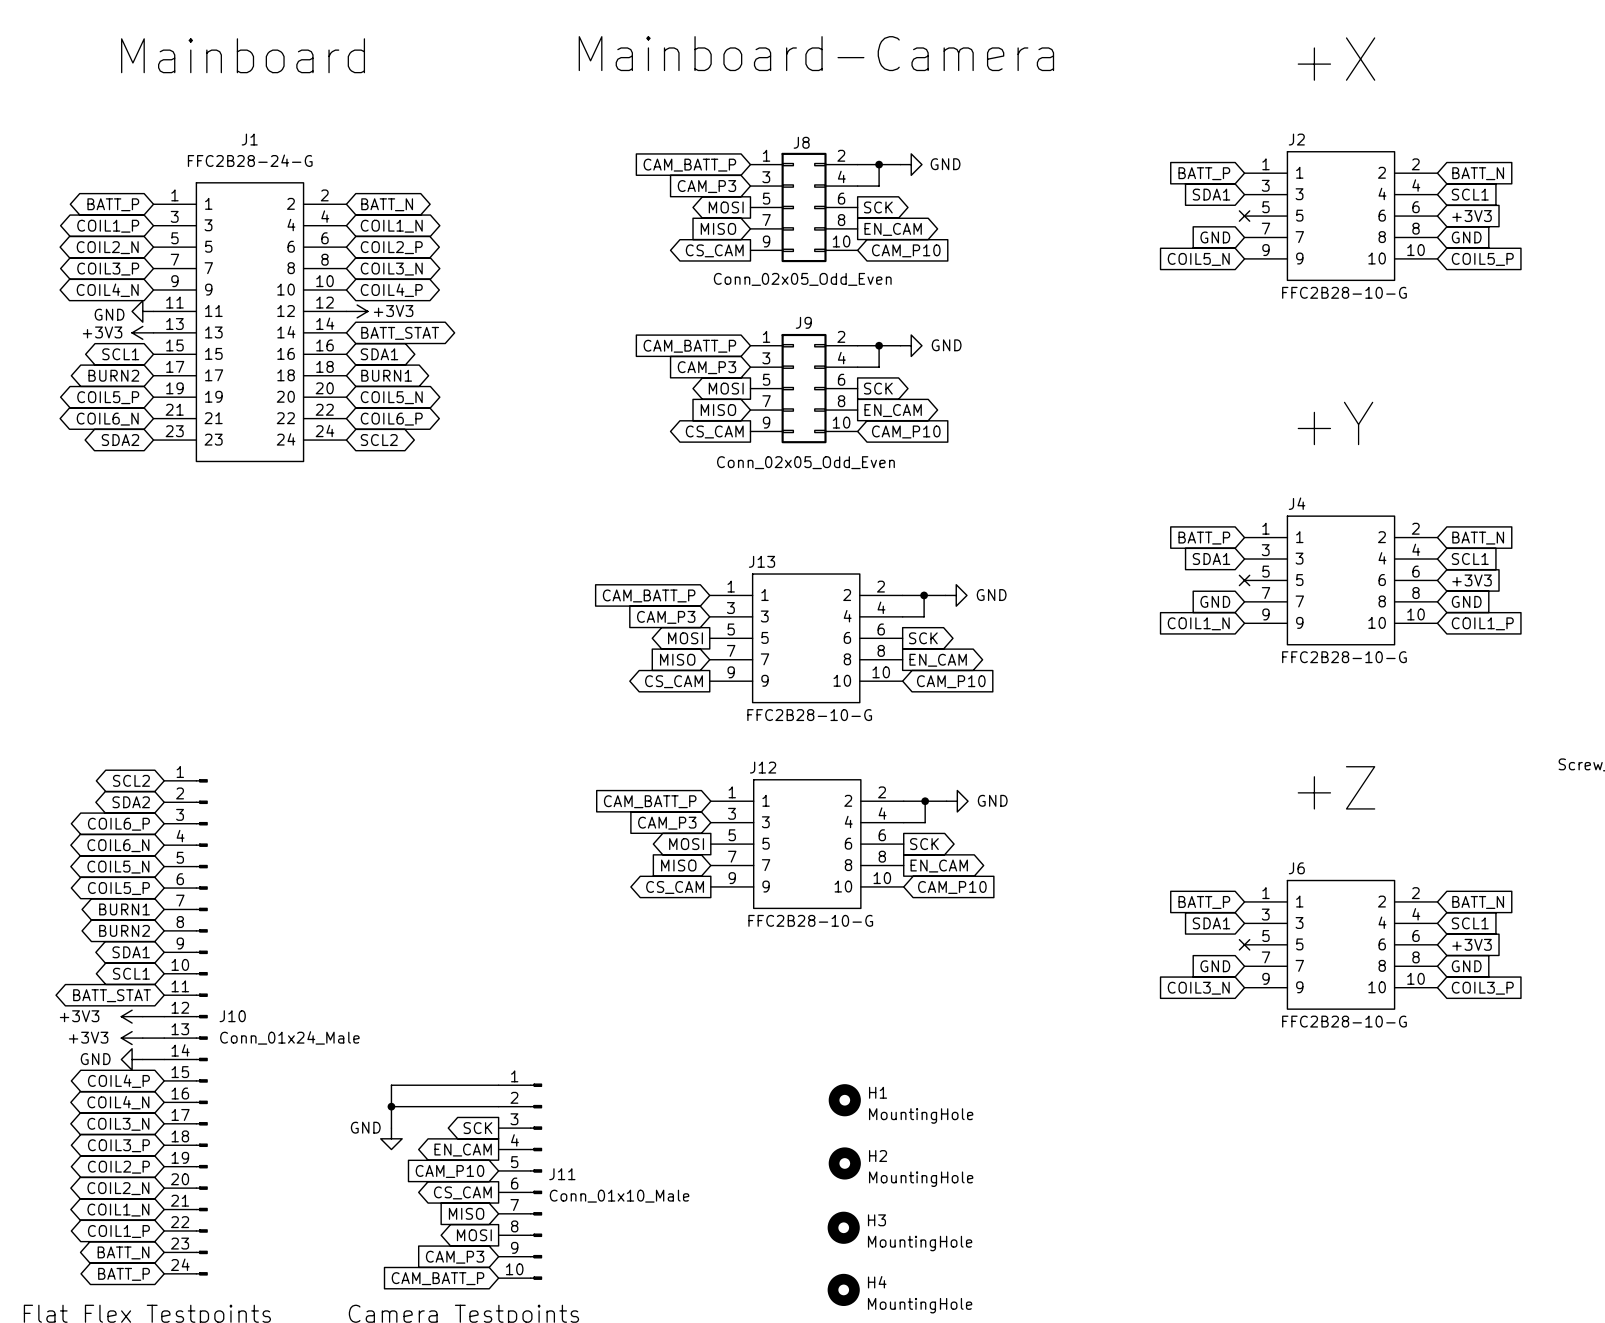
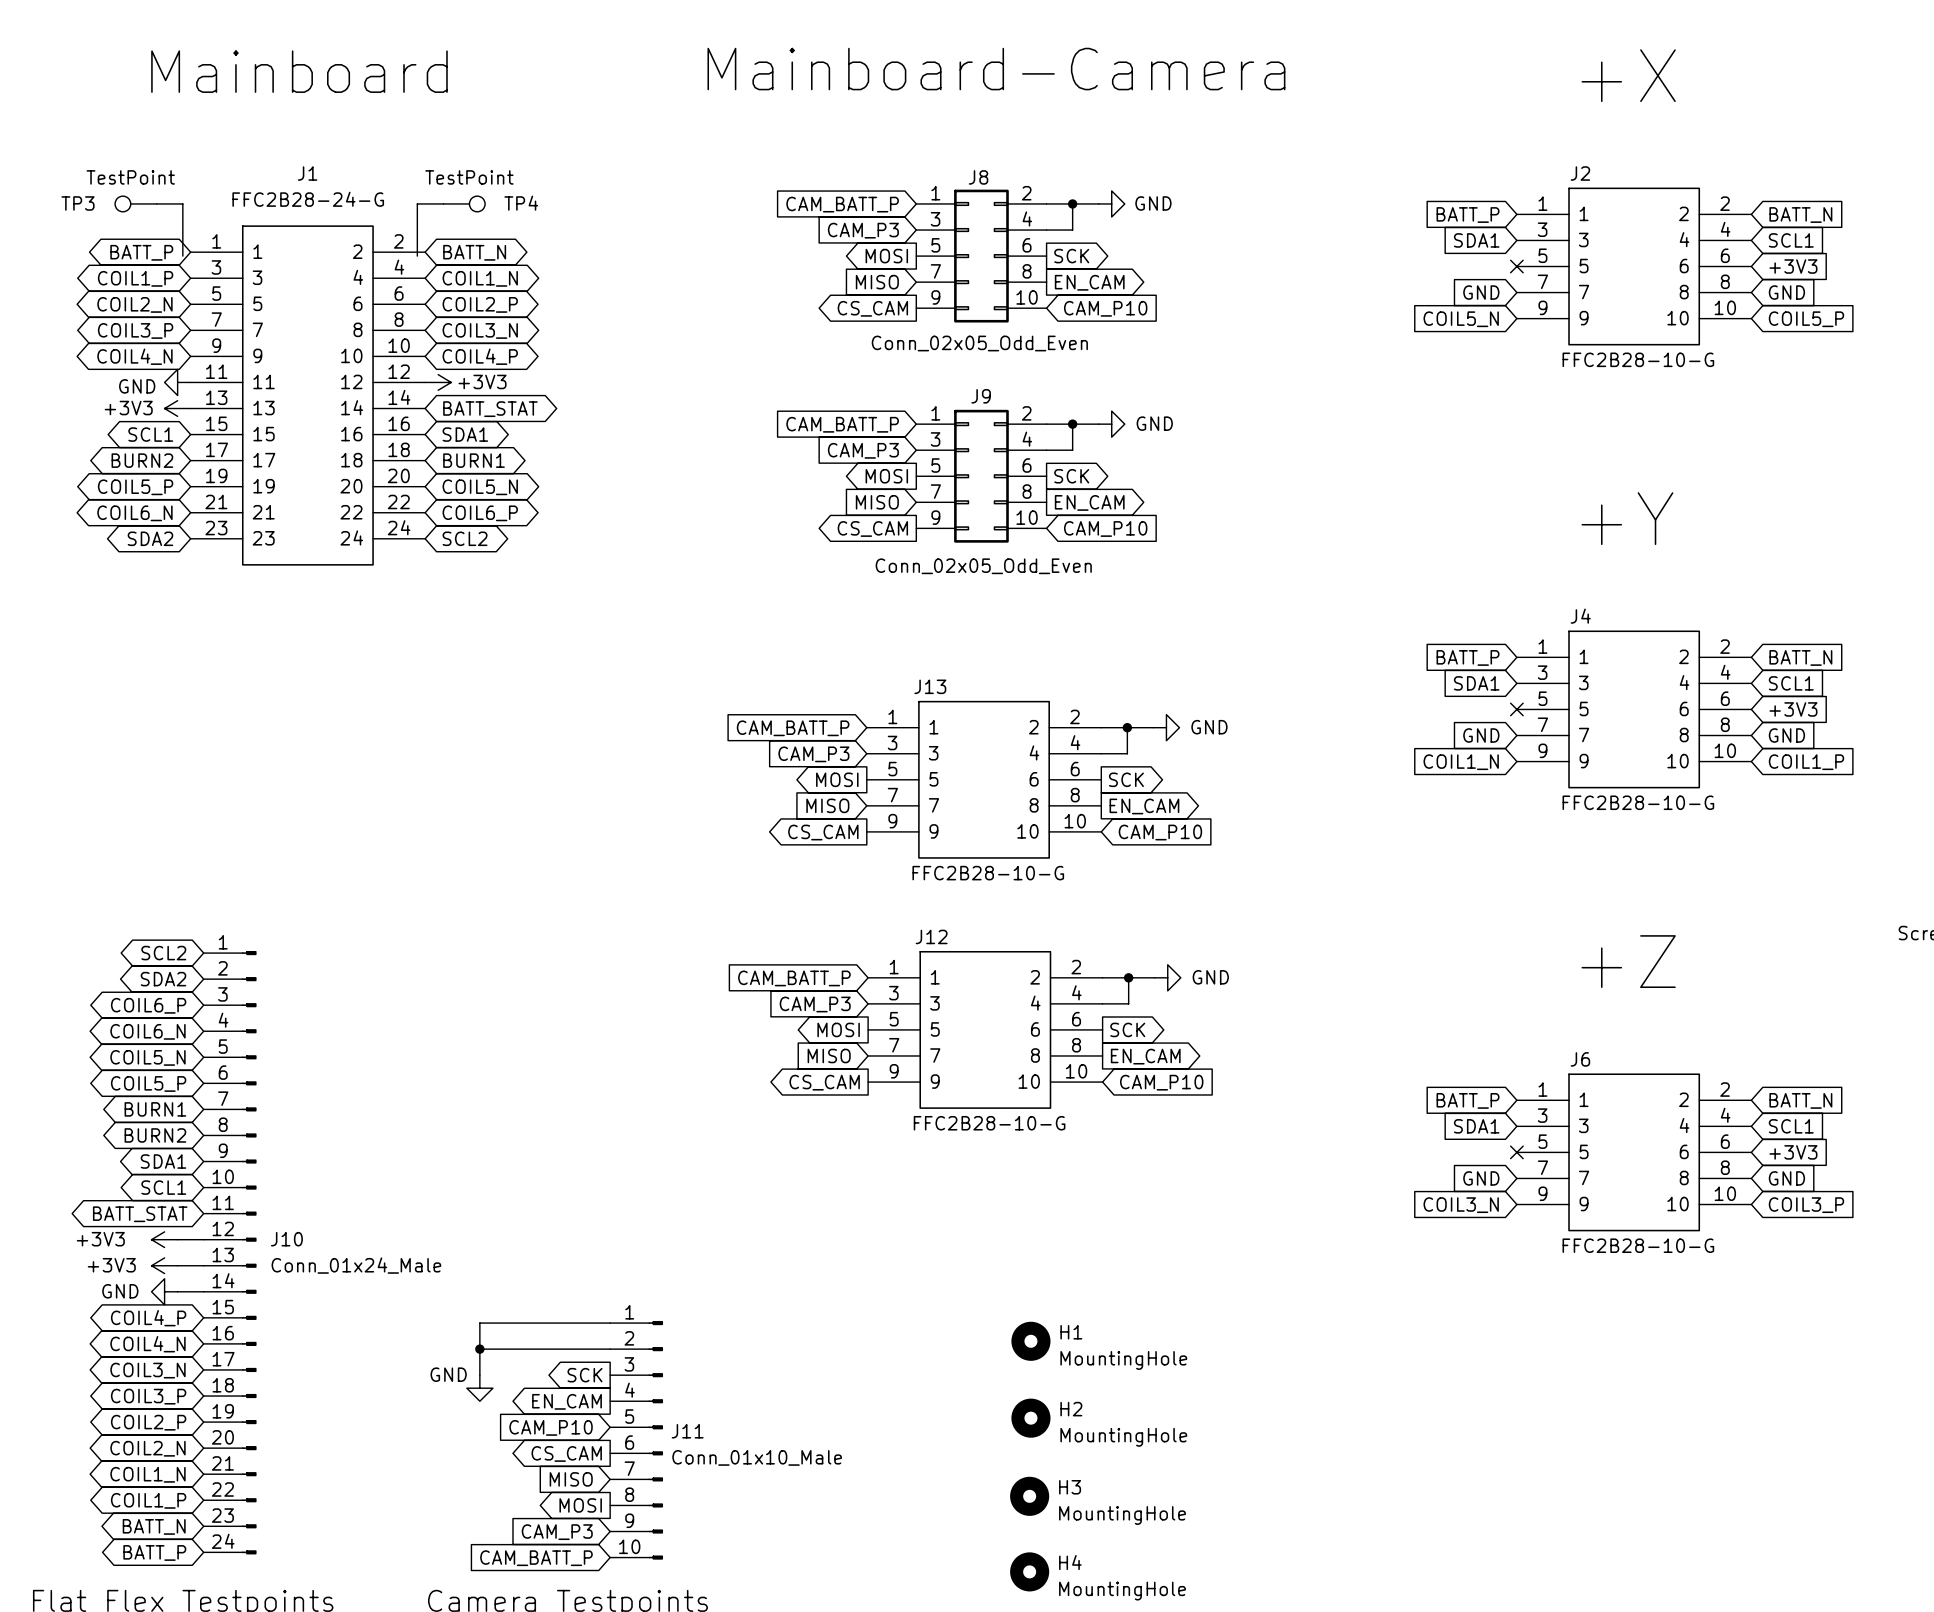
TP3: none -> TestPoint (135, 203)
wire: none -> (156, 203) (182, 203) (182, 256)
wire: none -> (443, 203) (417, 203) (417, 256)
TP4: none -> TestPoint (464, 203)

